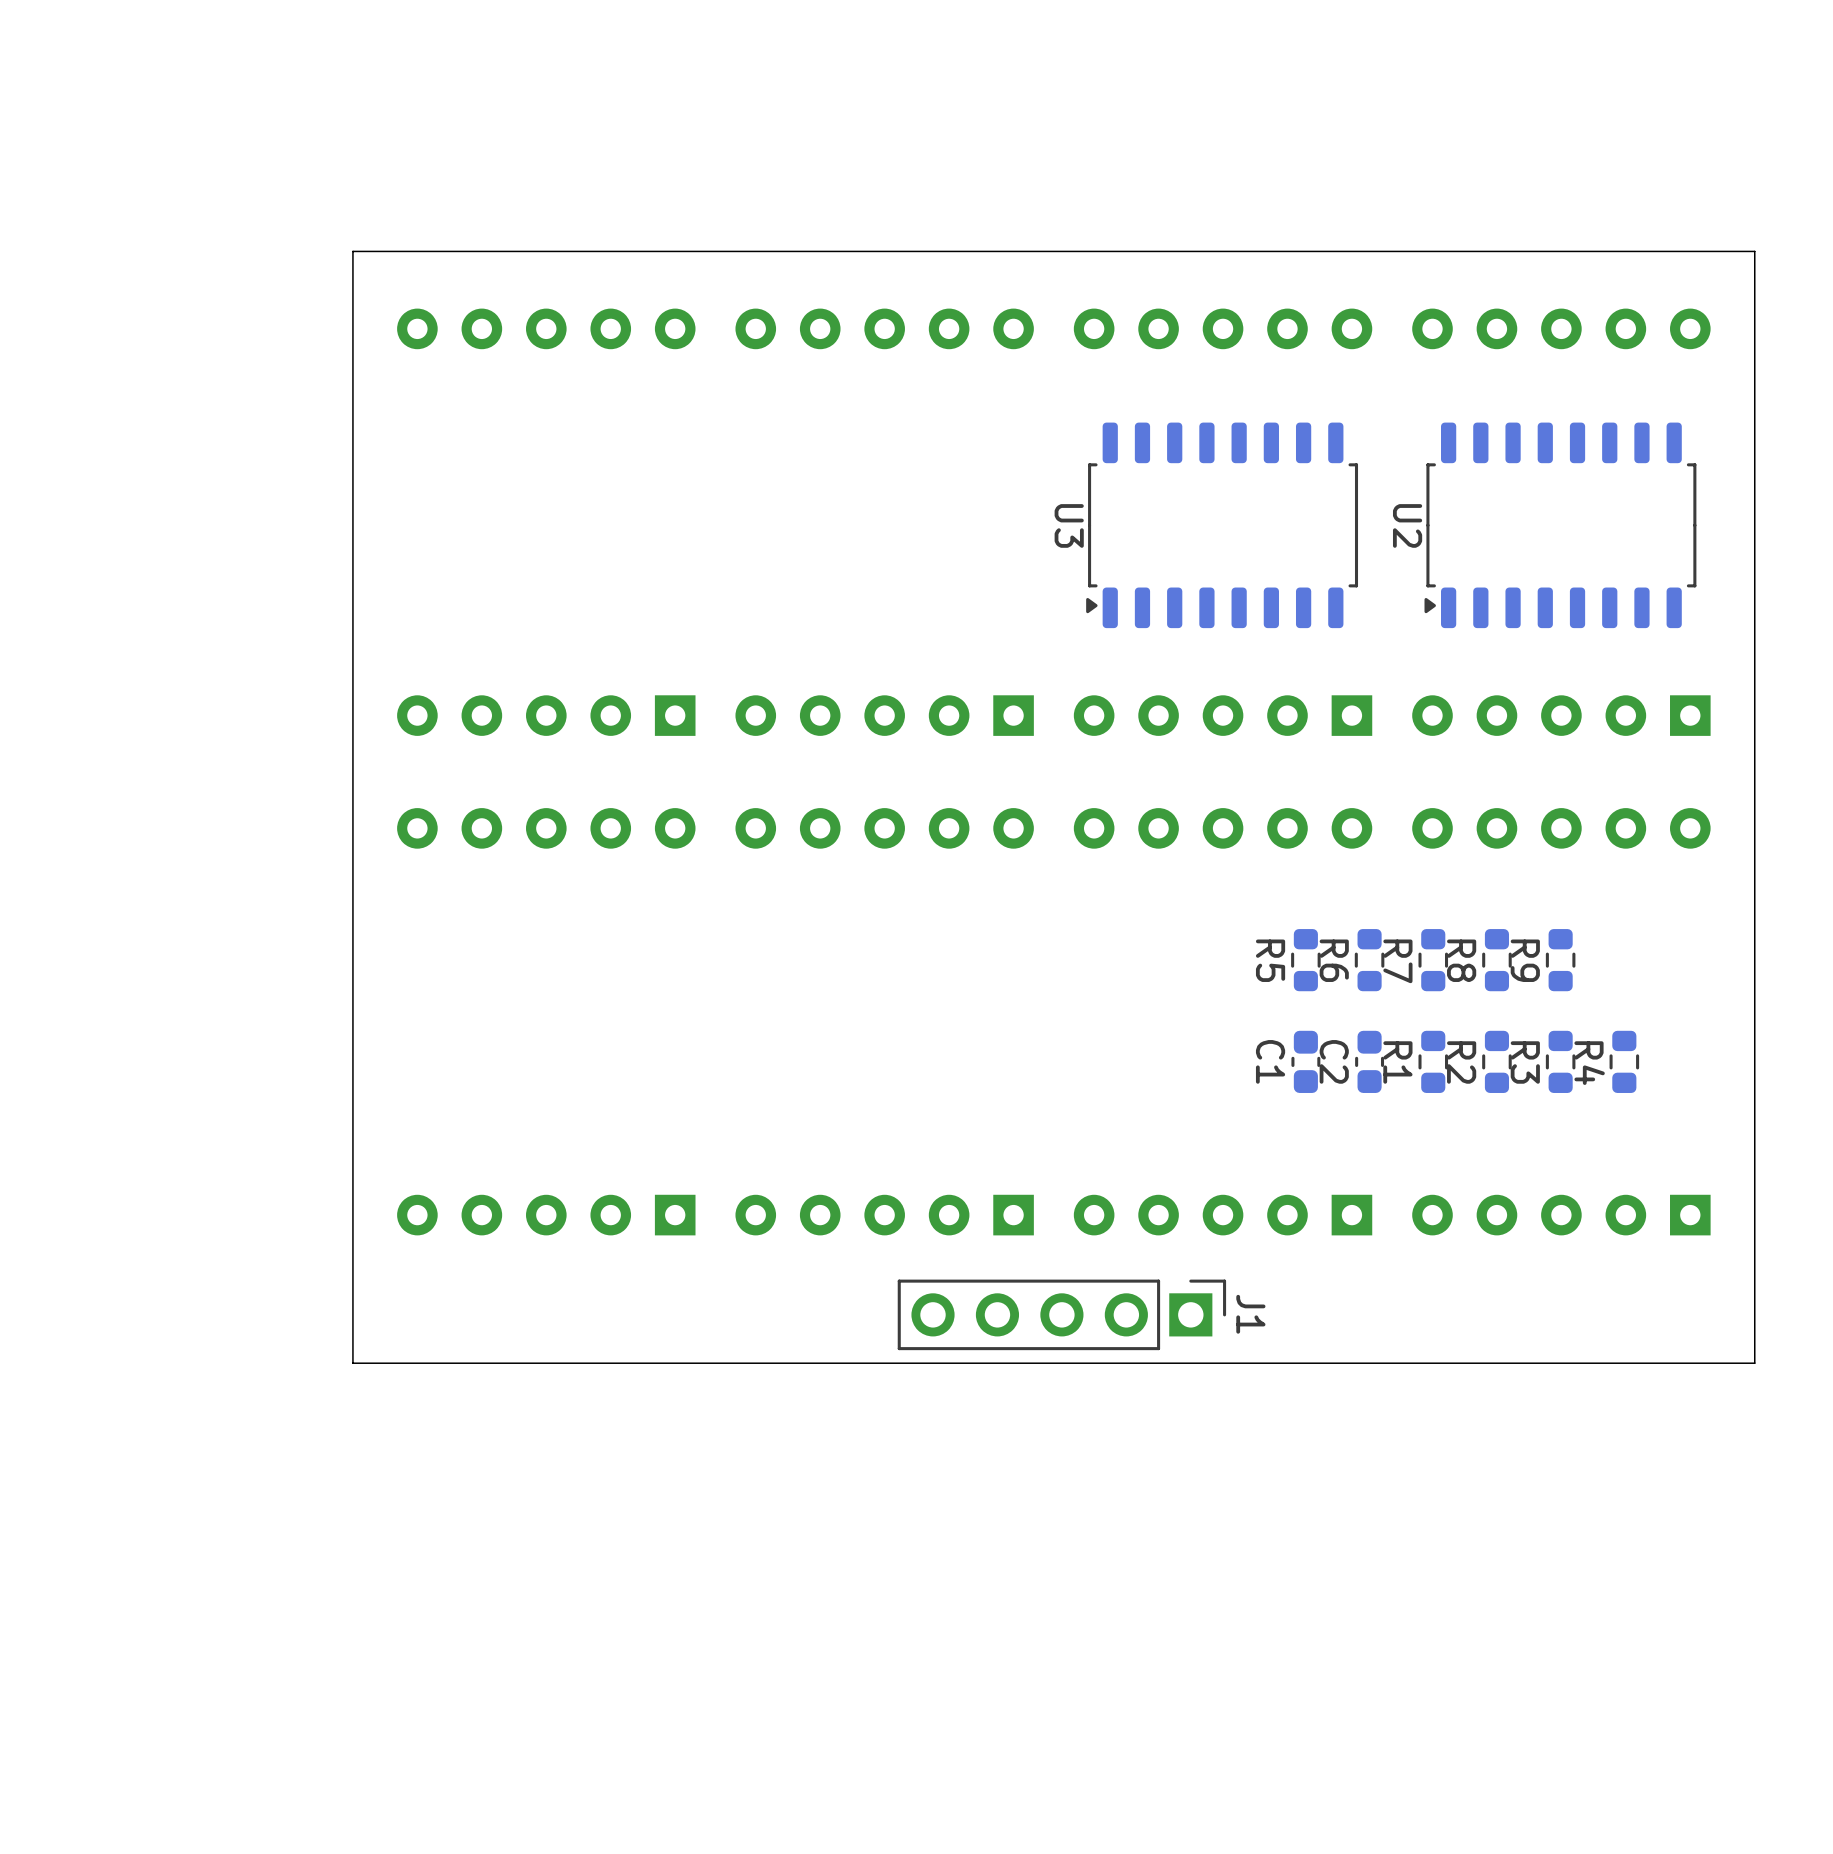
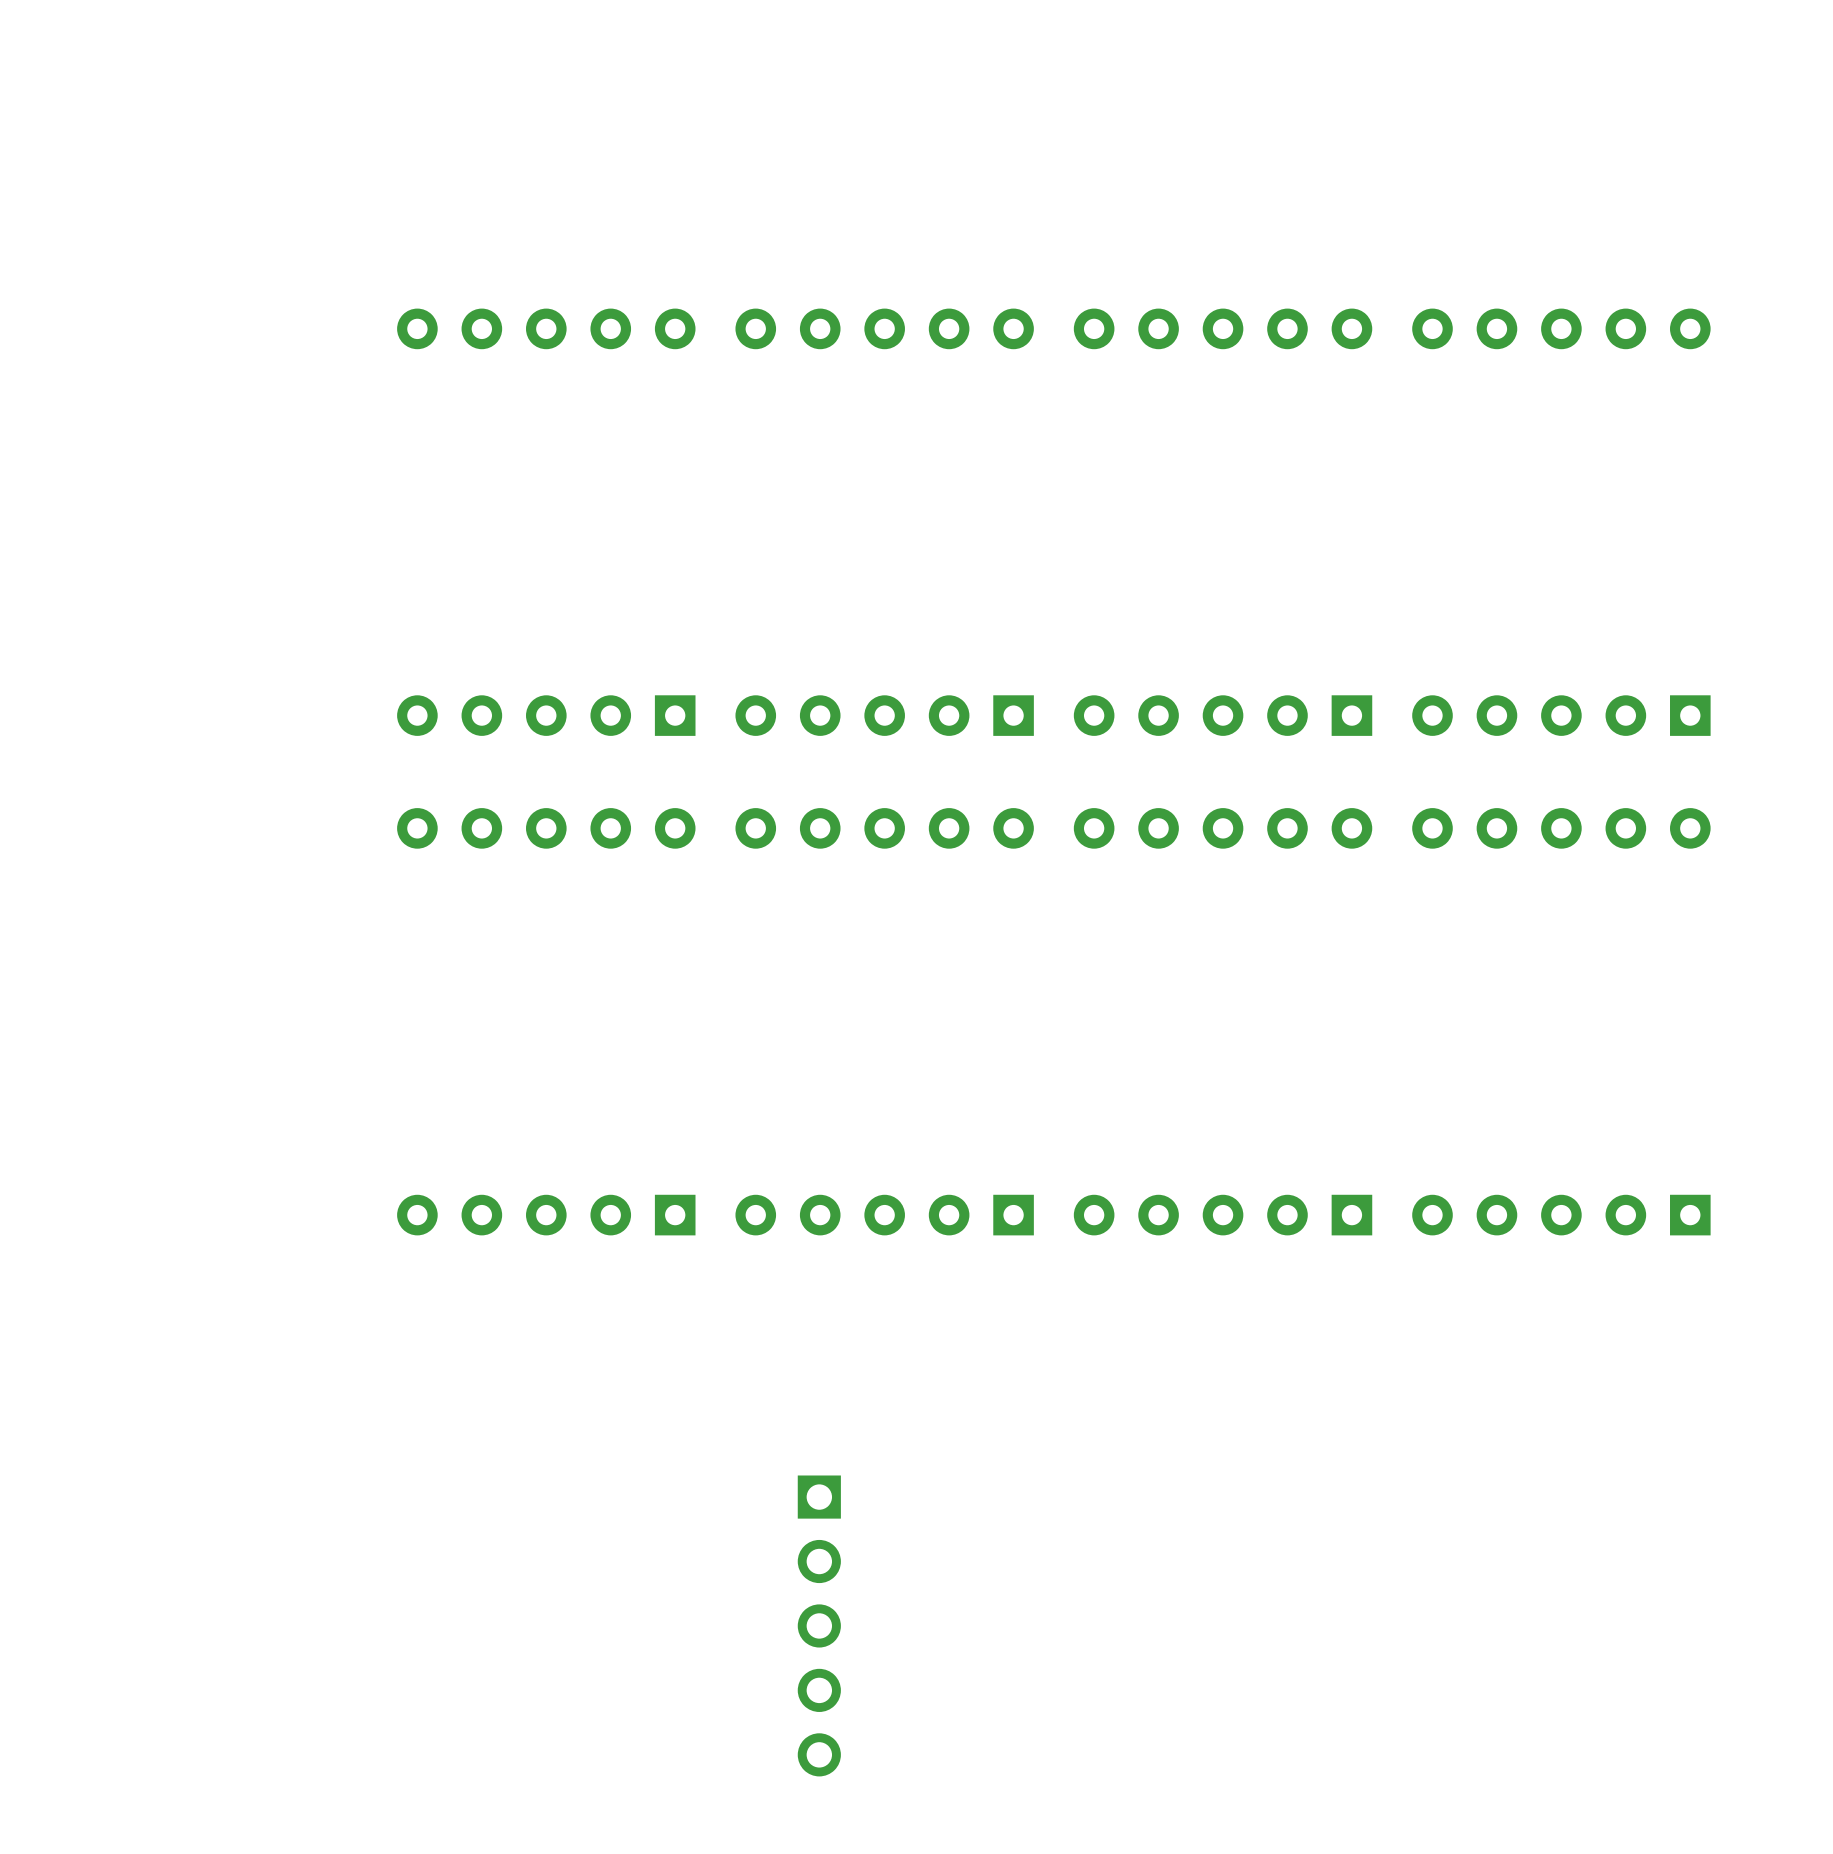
board edge: (1754, 251) (352, 251) (352, 1363) (1754, 1363) (1754, 251) -> none
U3: (1222, 525) -> none
U2: (1560, 525) -> none
R5: (1305, 960) -> none
R6: (1369, 960) -> none
R7: (1433, 960) -> none
R8: (1496, 960) -> none
R9: (1560, 960) -> none
C1: (1305, 1061) -> none
C2: (1369, 1061) -> none
R1: (1433, 1061) -> none
R2: (1496, 1061) -> none
R3: (1560, 1061) -> none
R4: (1624, 1061) -> none
J1 side: bottom (1061, 1314) -> top (819, 1625)

